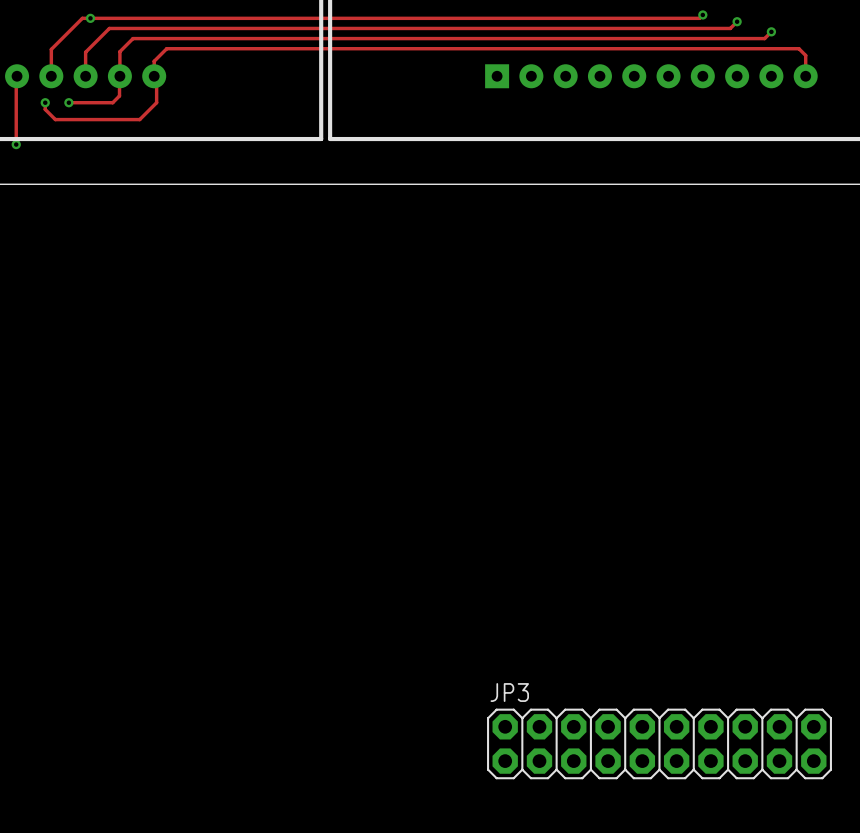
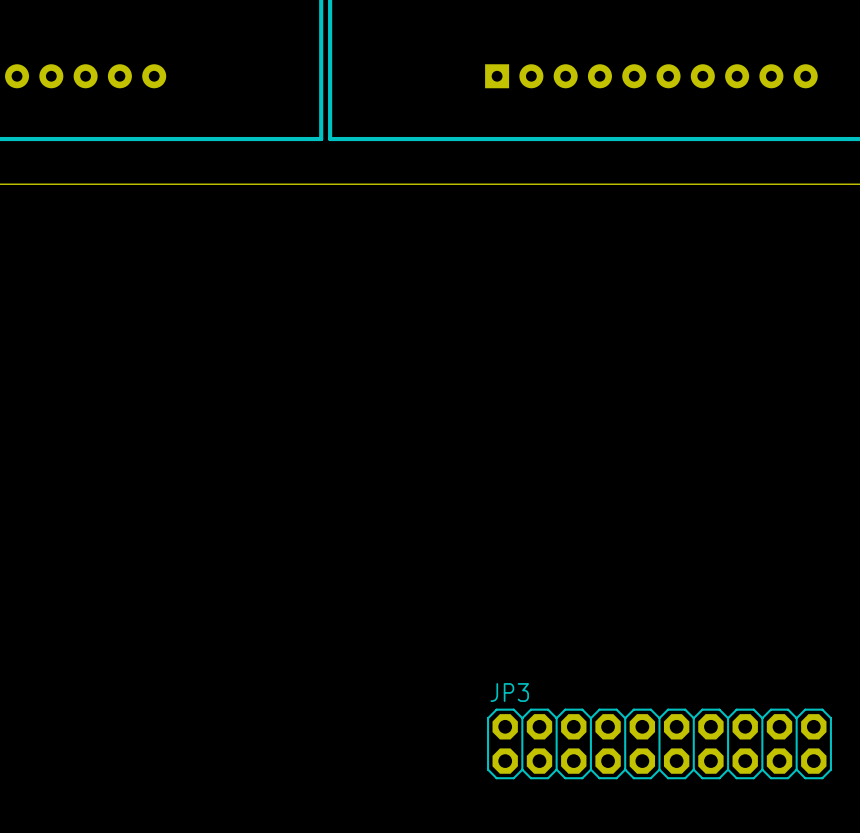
track: (702, 14) (699, 18) (82, 18) (51, 49) (51, 76) -> none
via: (702, 14) -> none
via: (90, 18) -> none
track: (737, 21) (730, 28) (109, 28) (85, 52) (85, 76) -> none
via: (737, 21) -> none
track: (771, 31) (764, 38) (133, 38) (119, 51) (119, 95) (112, 102) (68, 102) -> none
via: (771, 31) -> none
track: (17, 76) (16, 144) -> none
track: (805, 76) (805, 55) (798, 48) (166, 48) (154, 61) (156, 102) (139, 119) (55, 119) (45, 109) (45, 102) -> none
via: (45, 102) -> none
via: (68, 102) -> none
via: (16, 144) -> none

